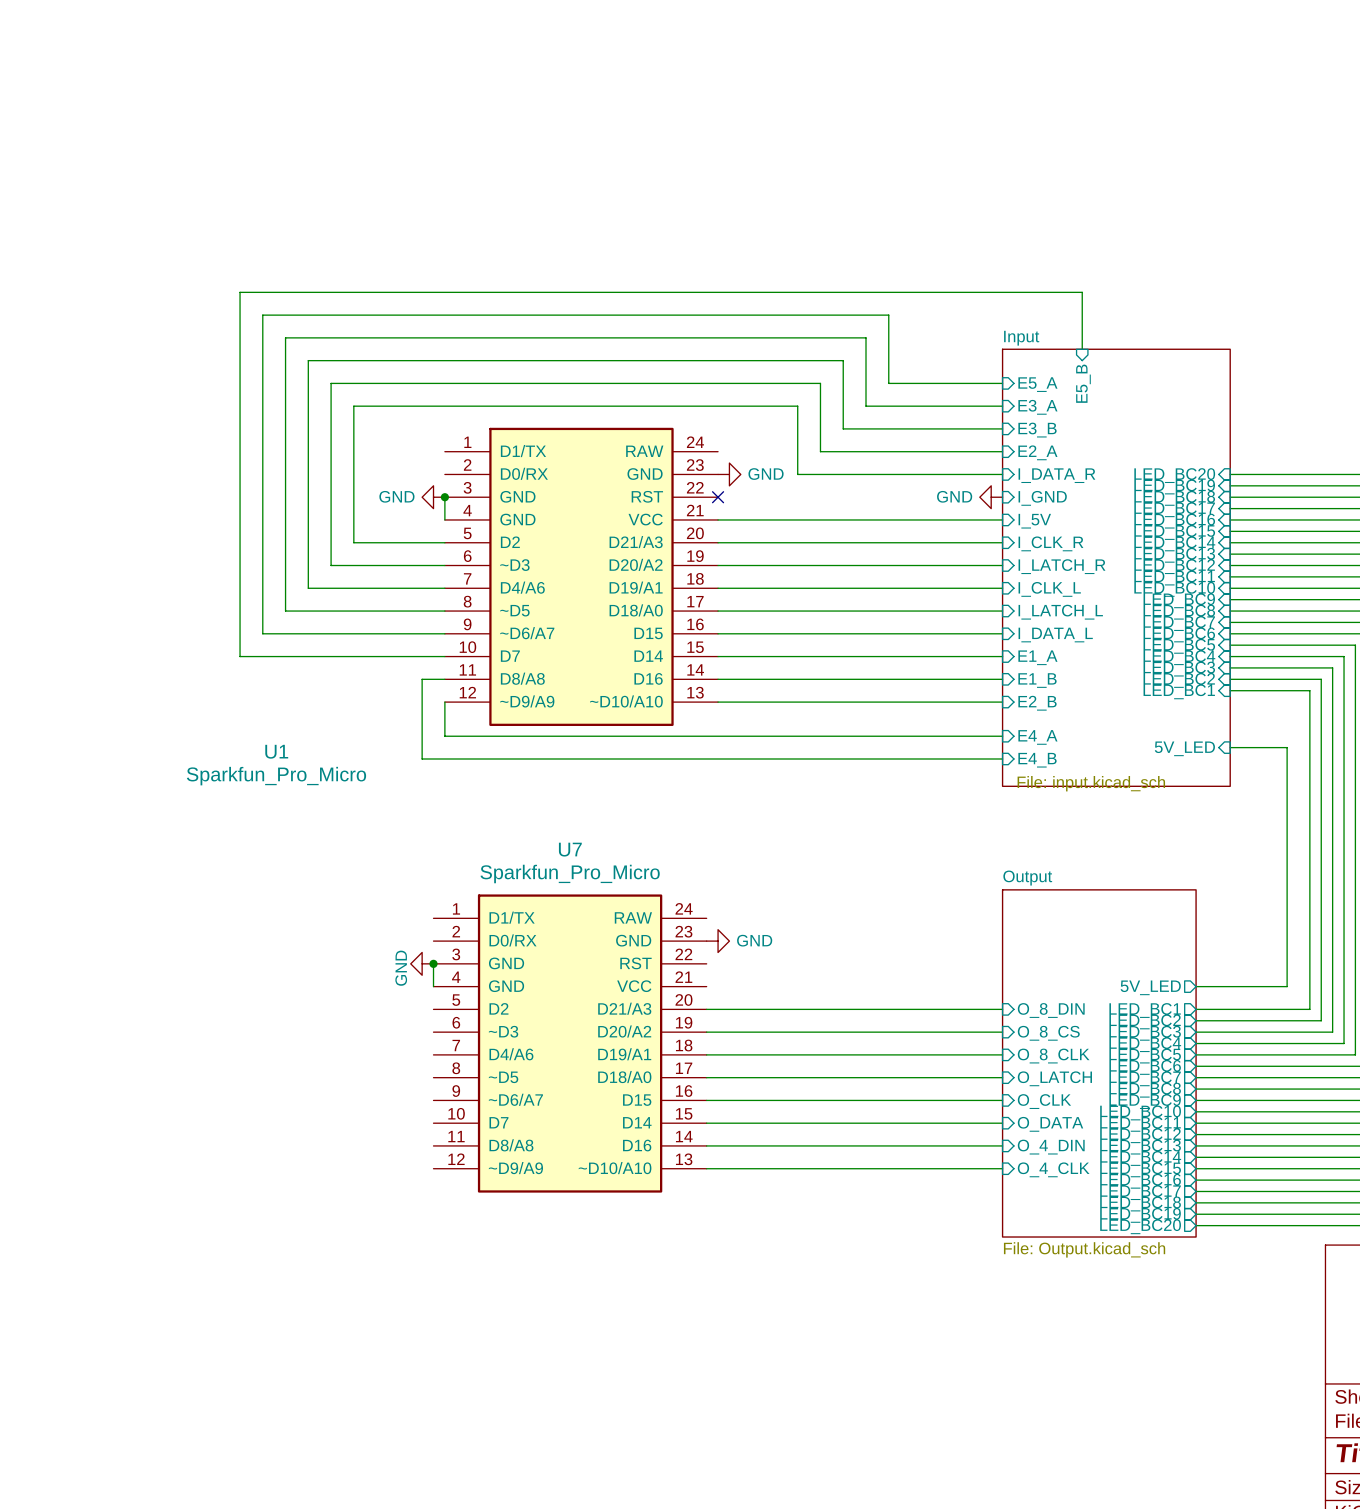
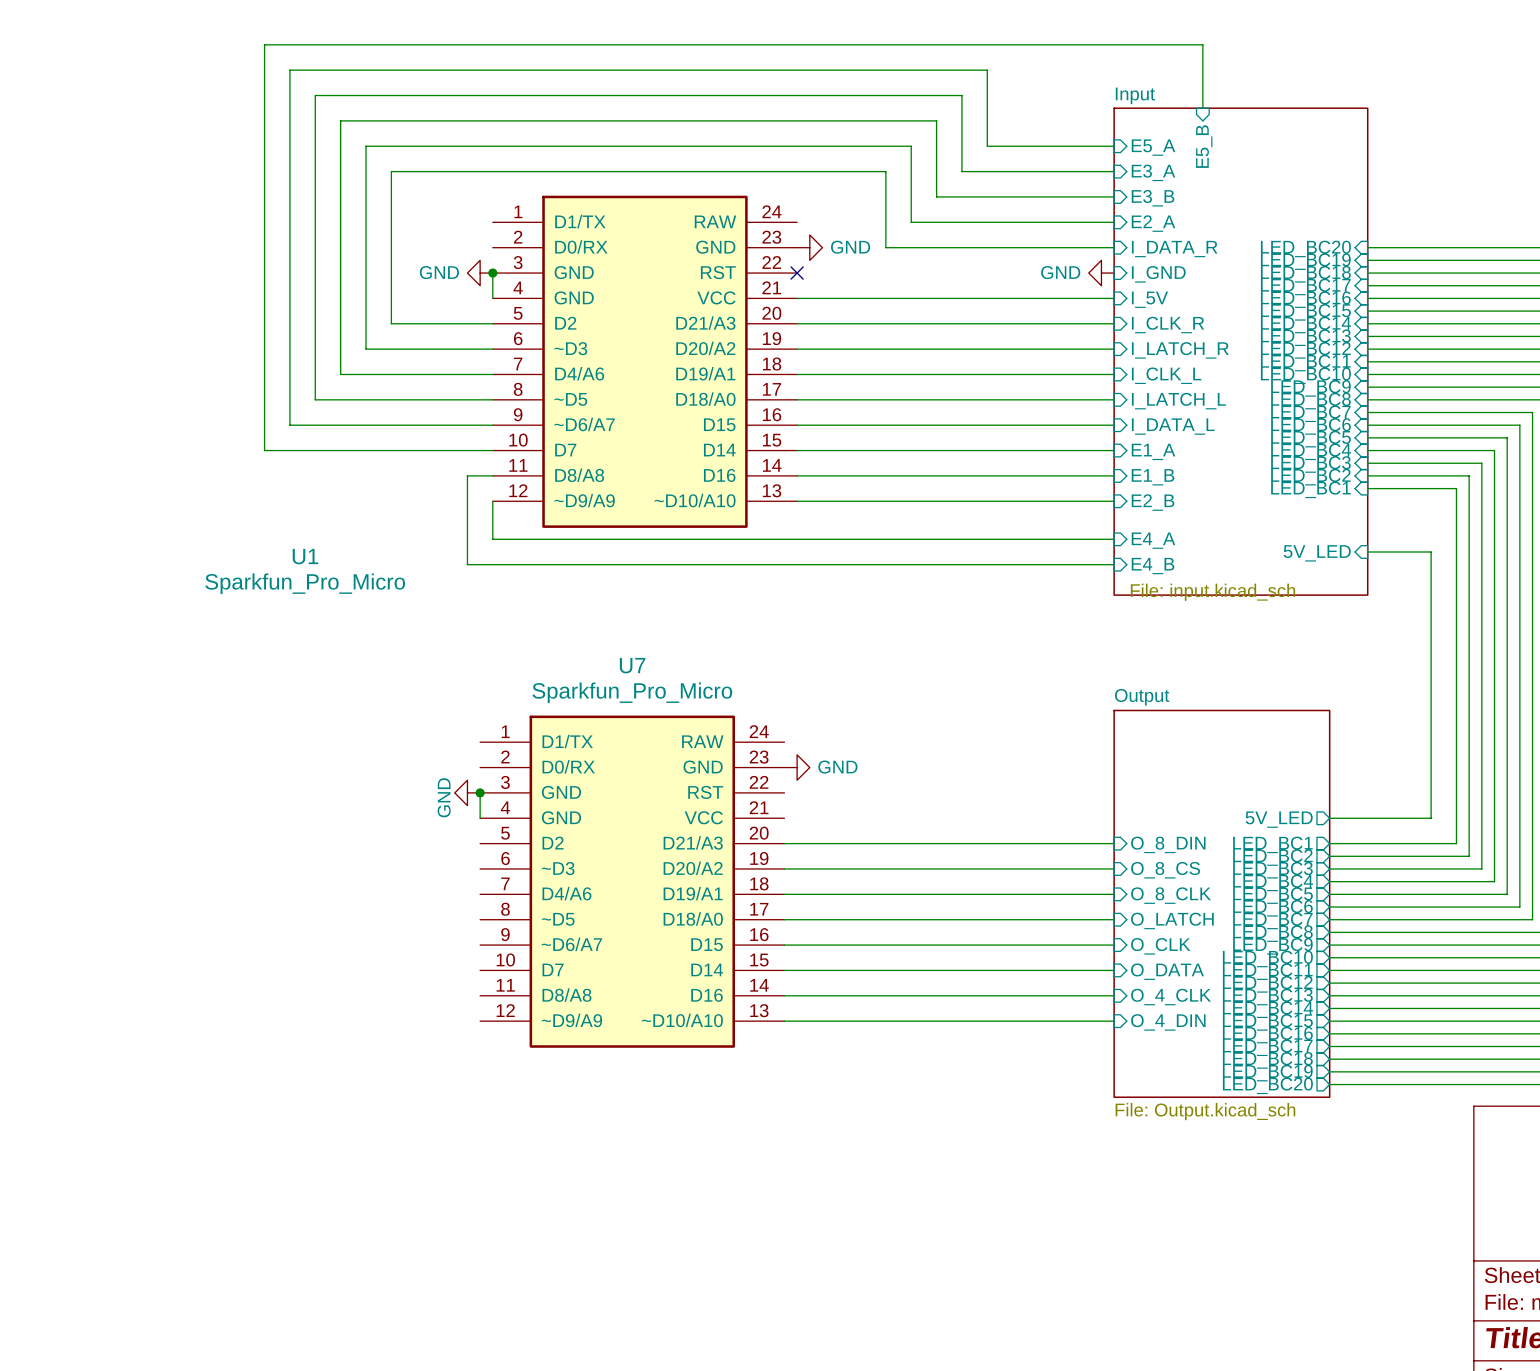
sheet pin: O_4_DIN (1051, 1147) -> O_4_CLK (1171, 997)
sheet pin: O_4_CLK (1053, 1169) -> O_4_DIN (1168, 1022)

